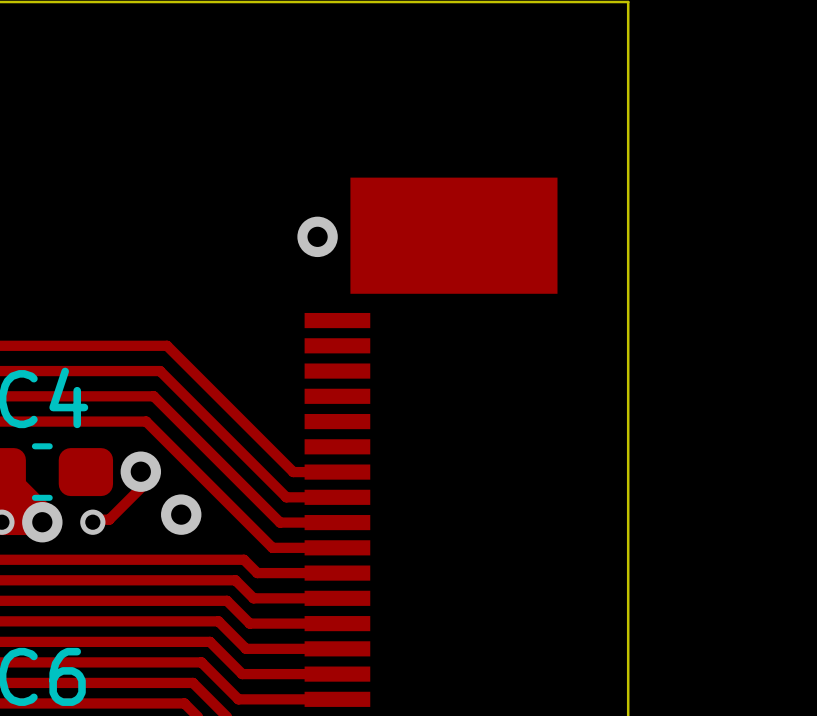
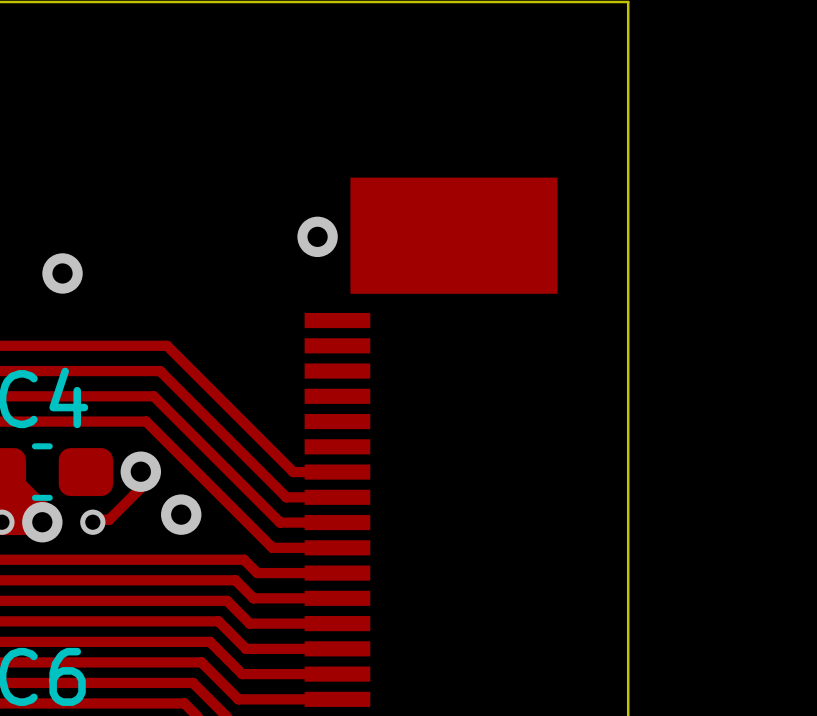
via: none -> (62, 273)

